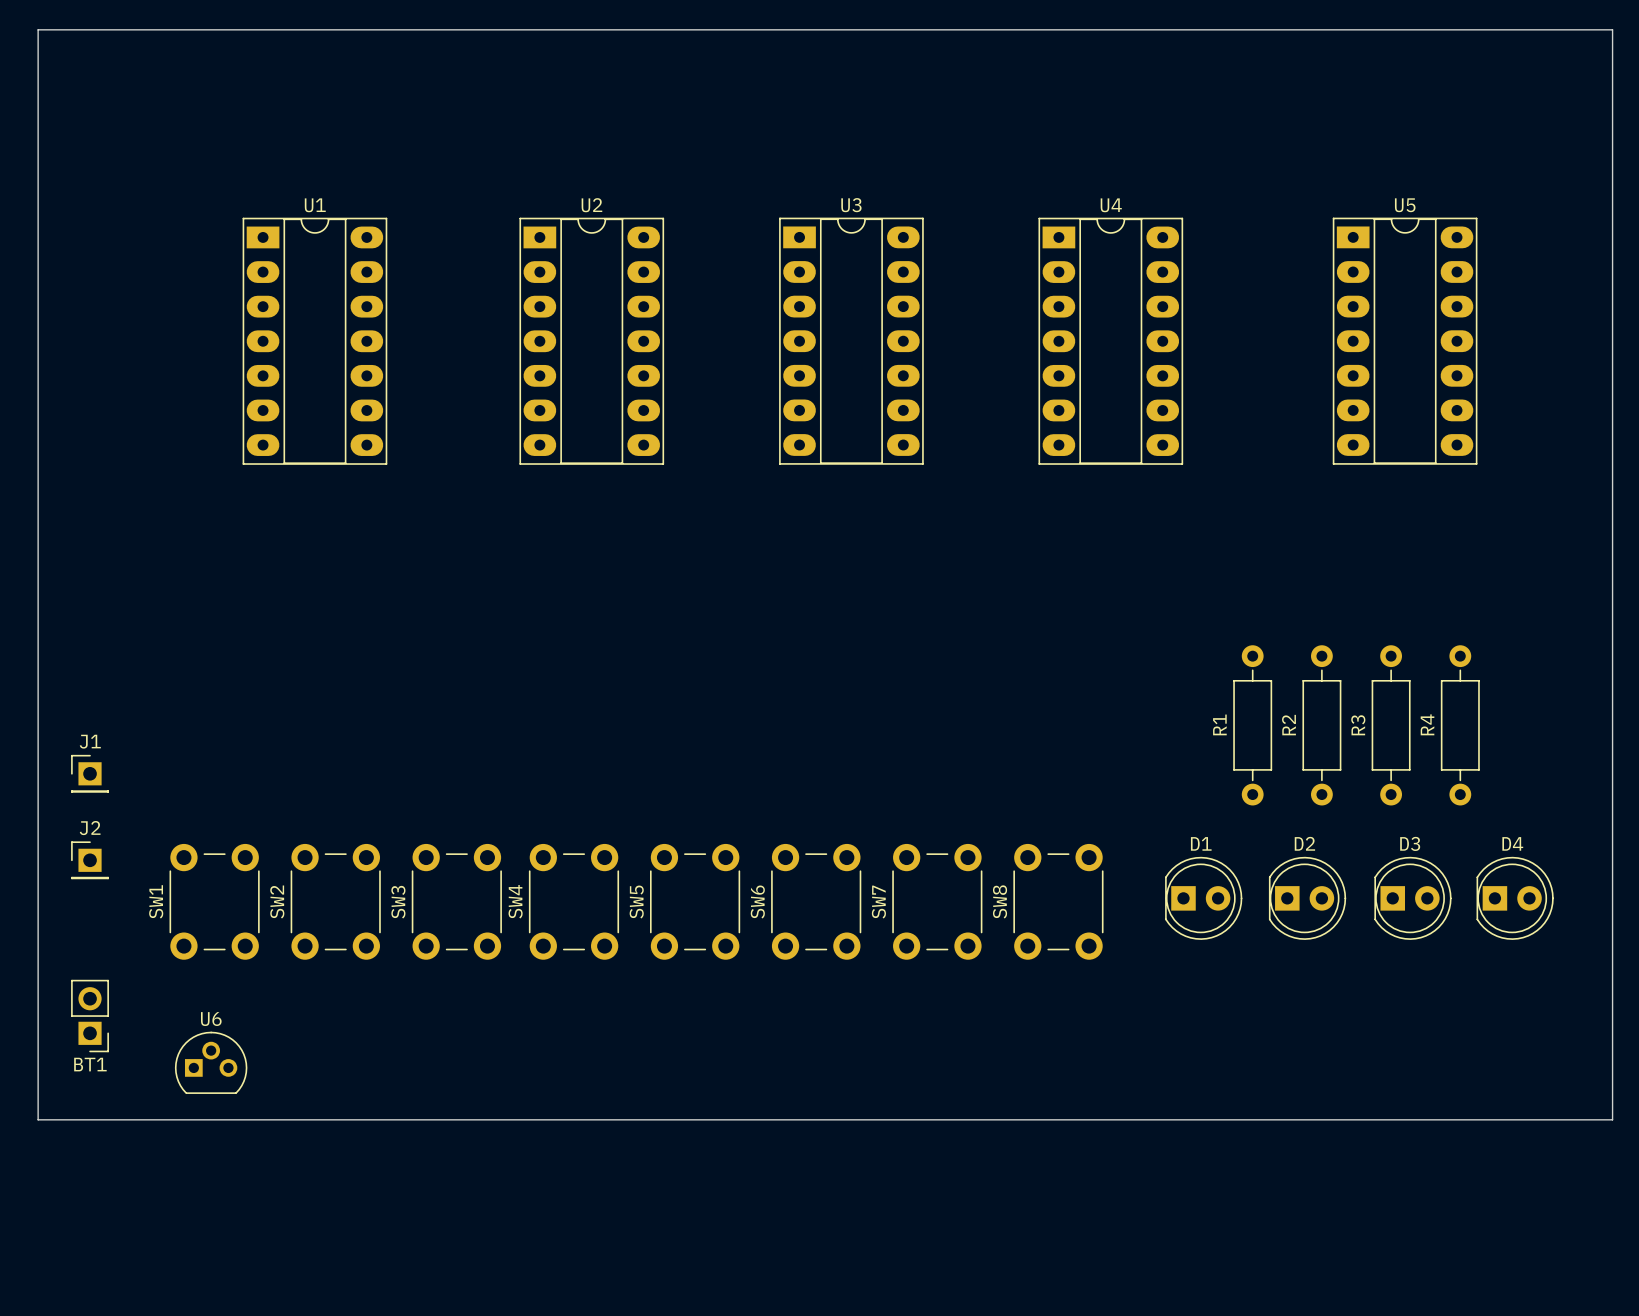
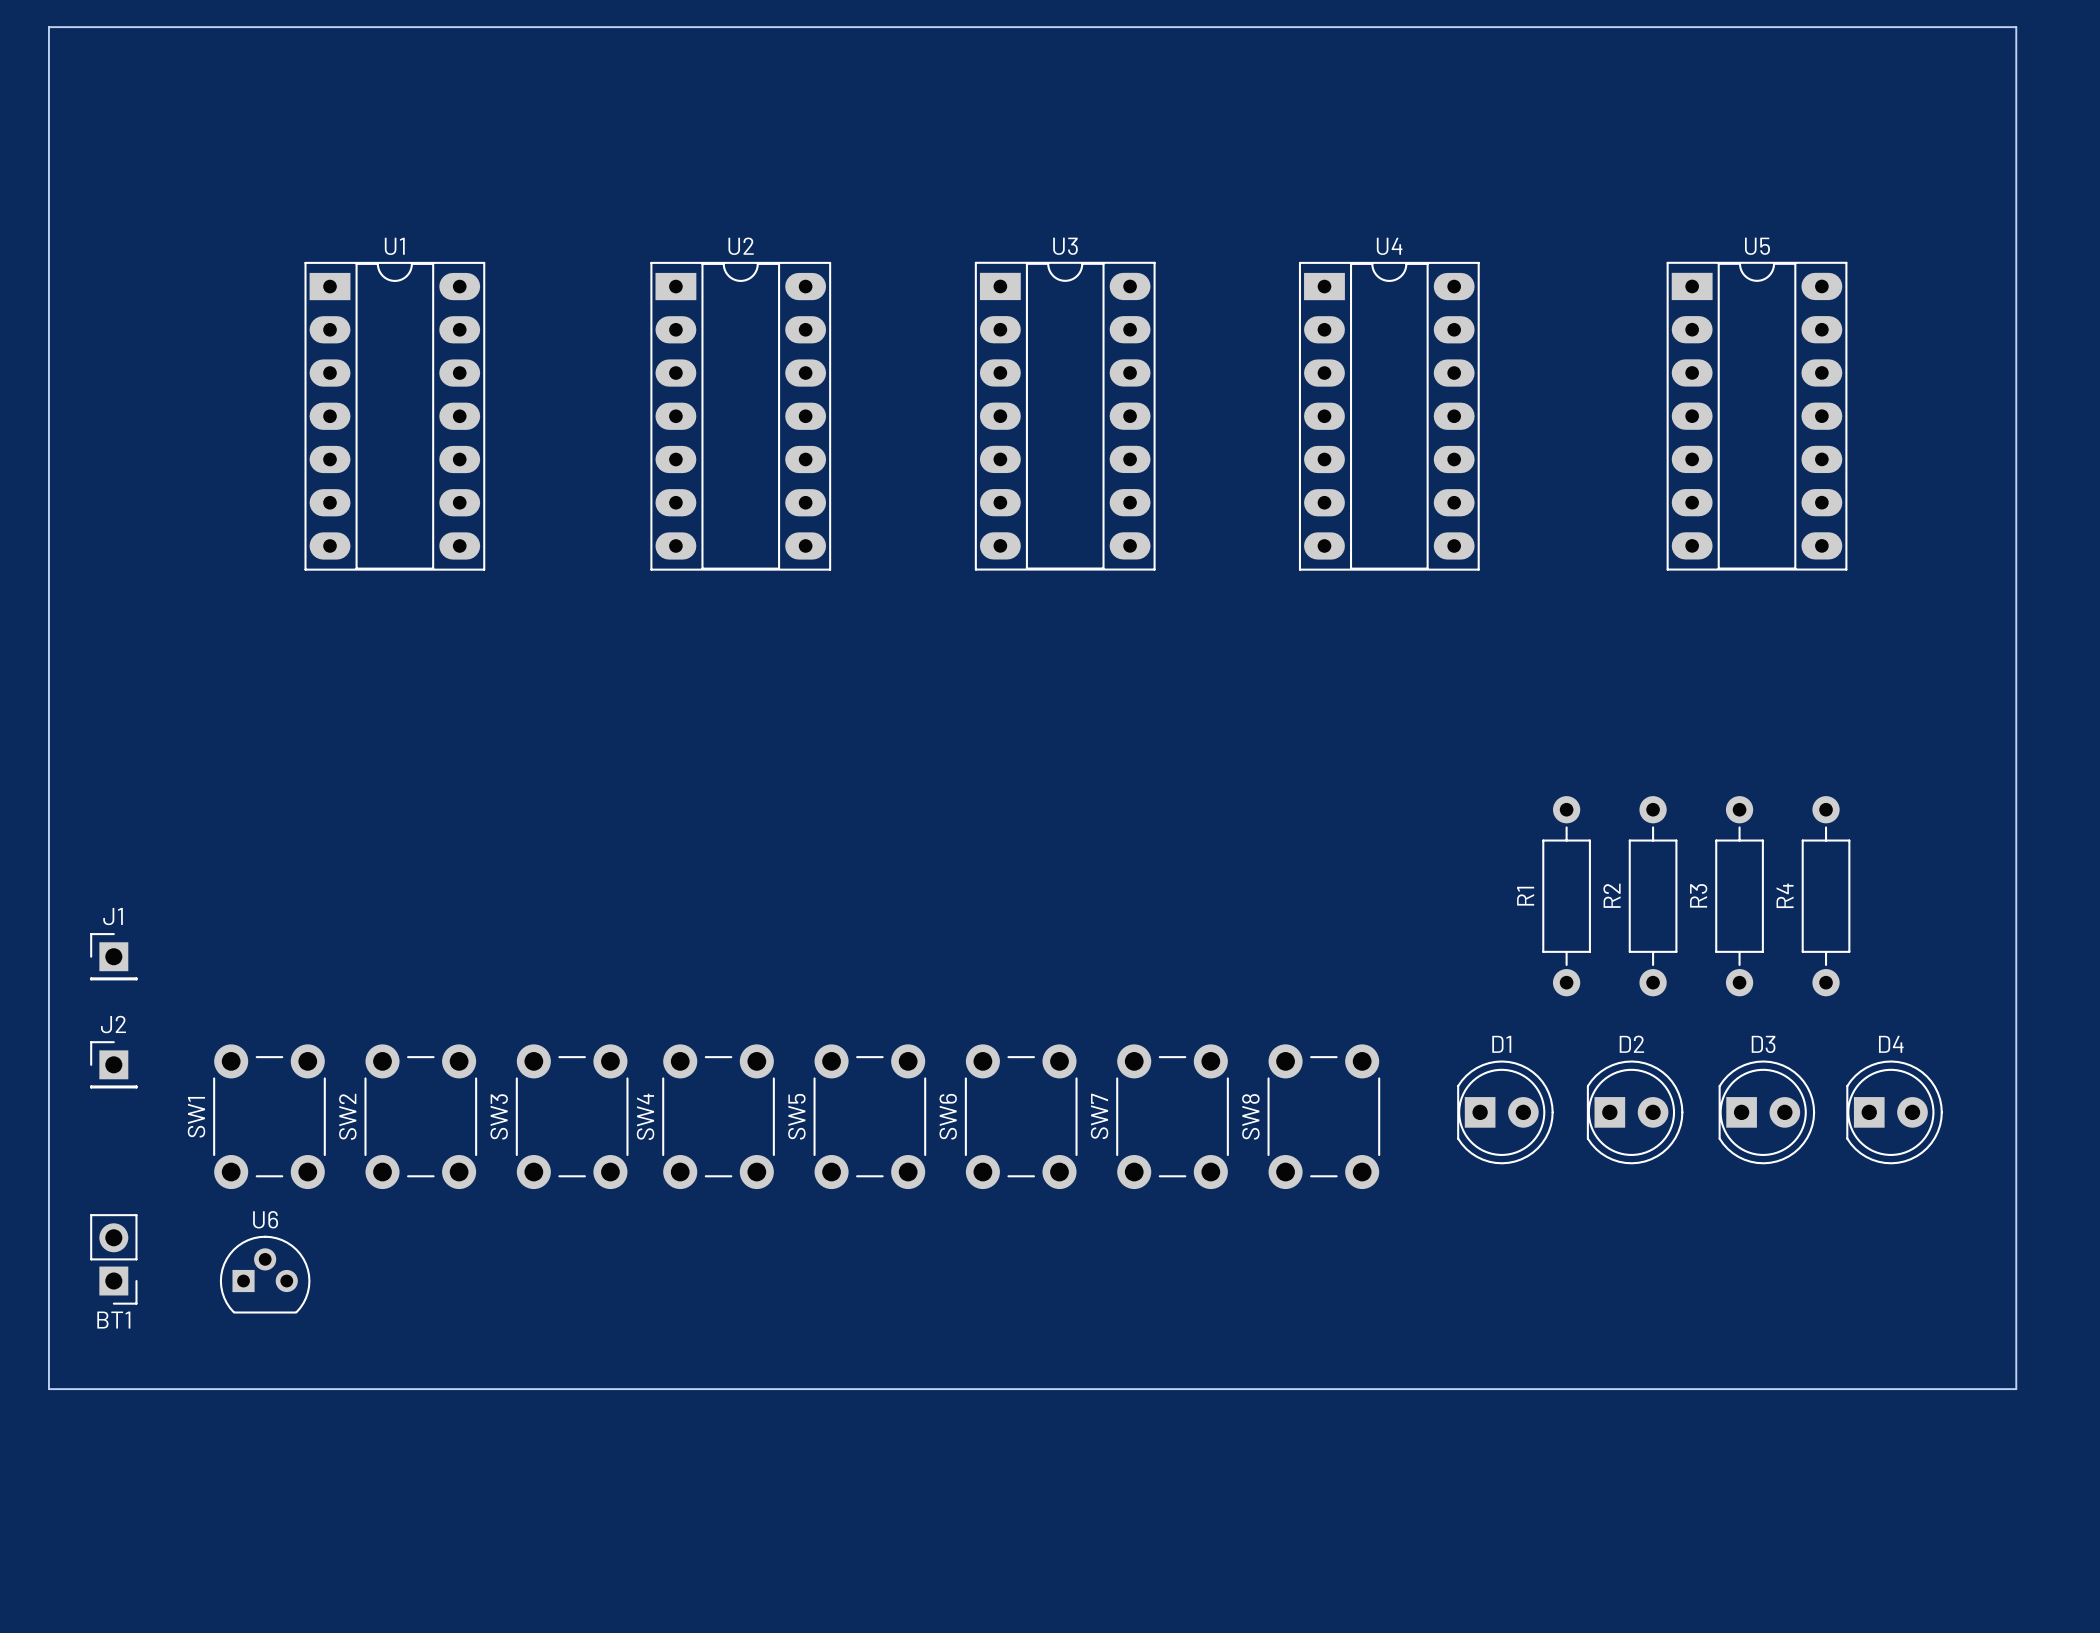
U6 position: (211, 1062) -> (265, 1274)

